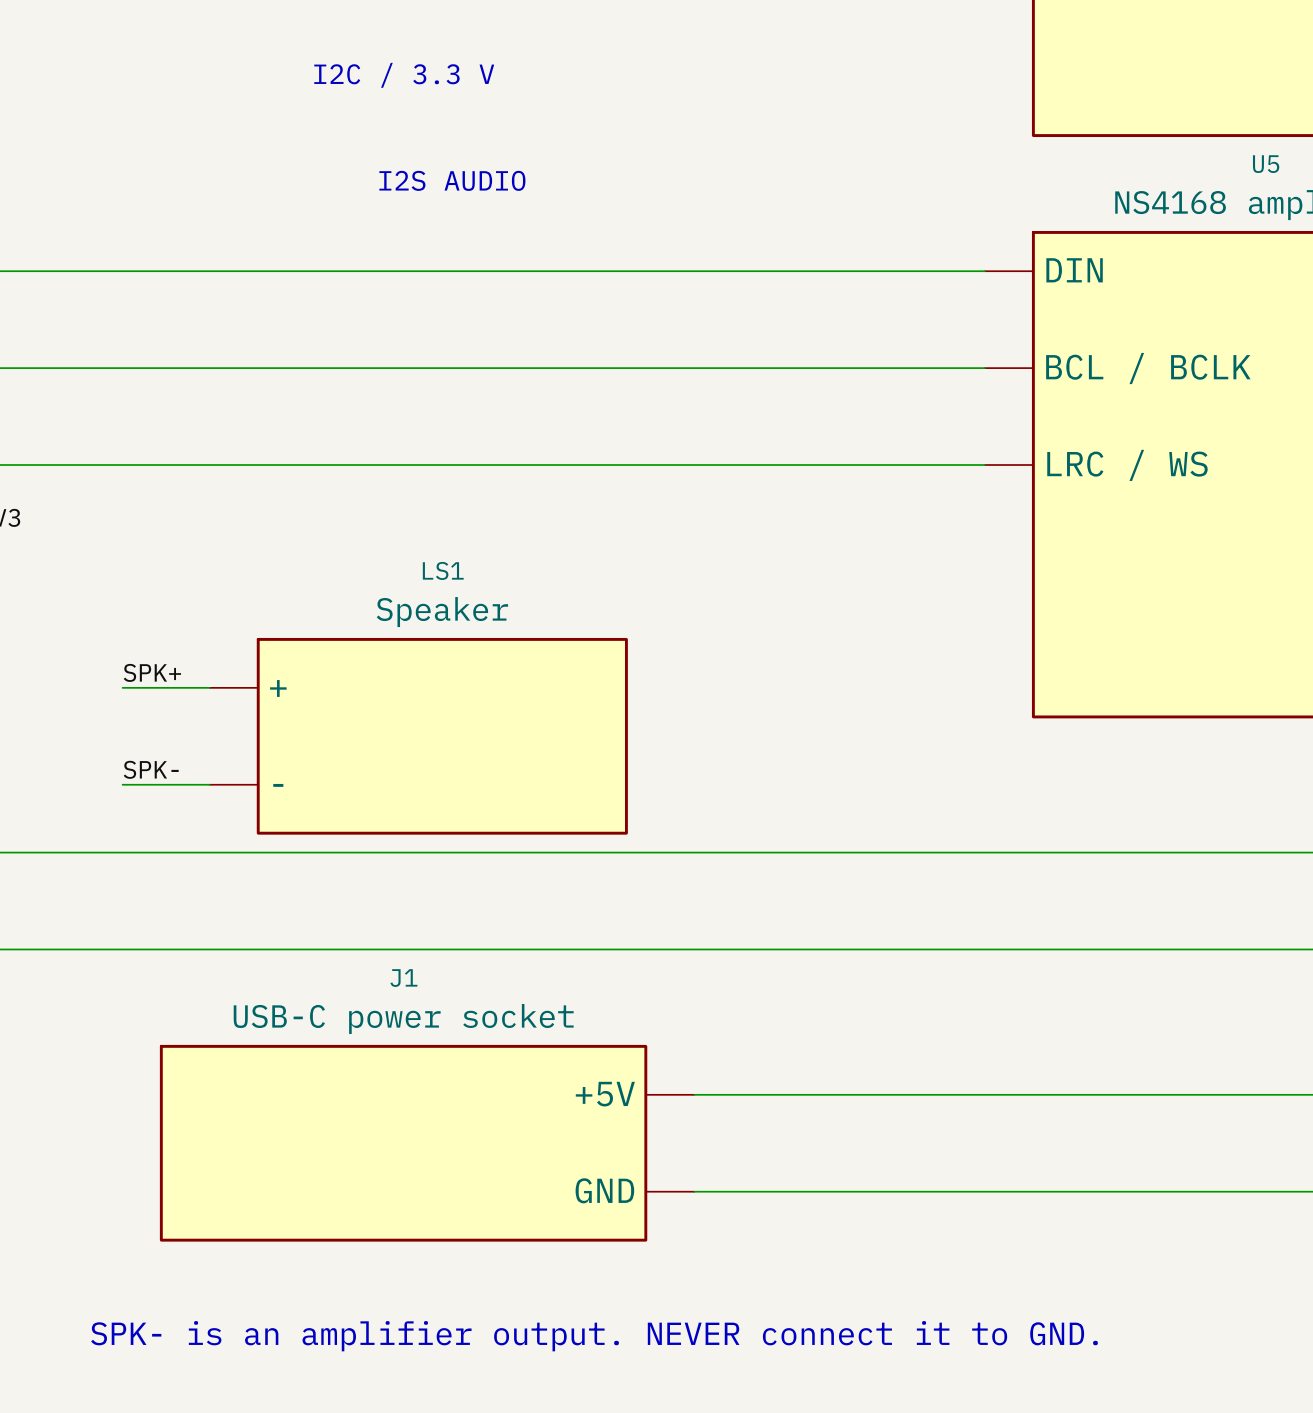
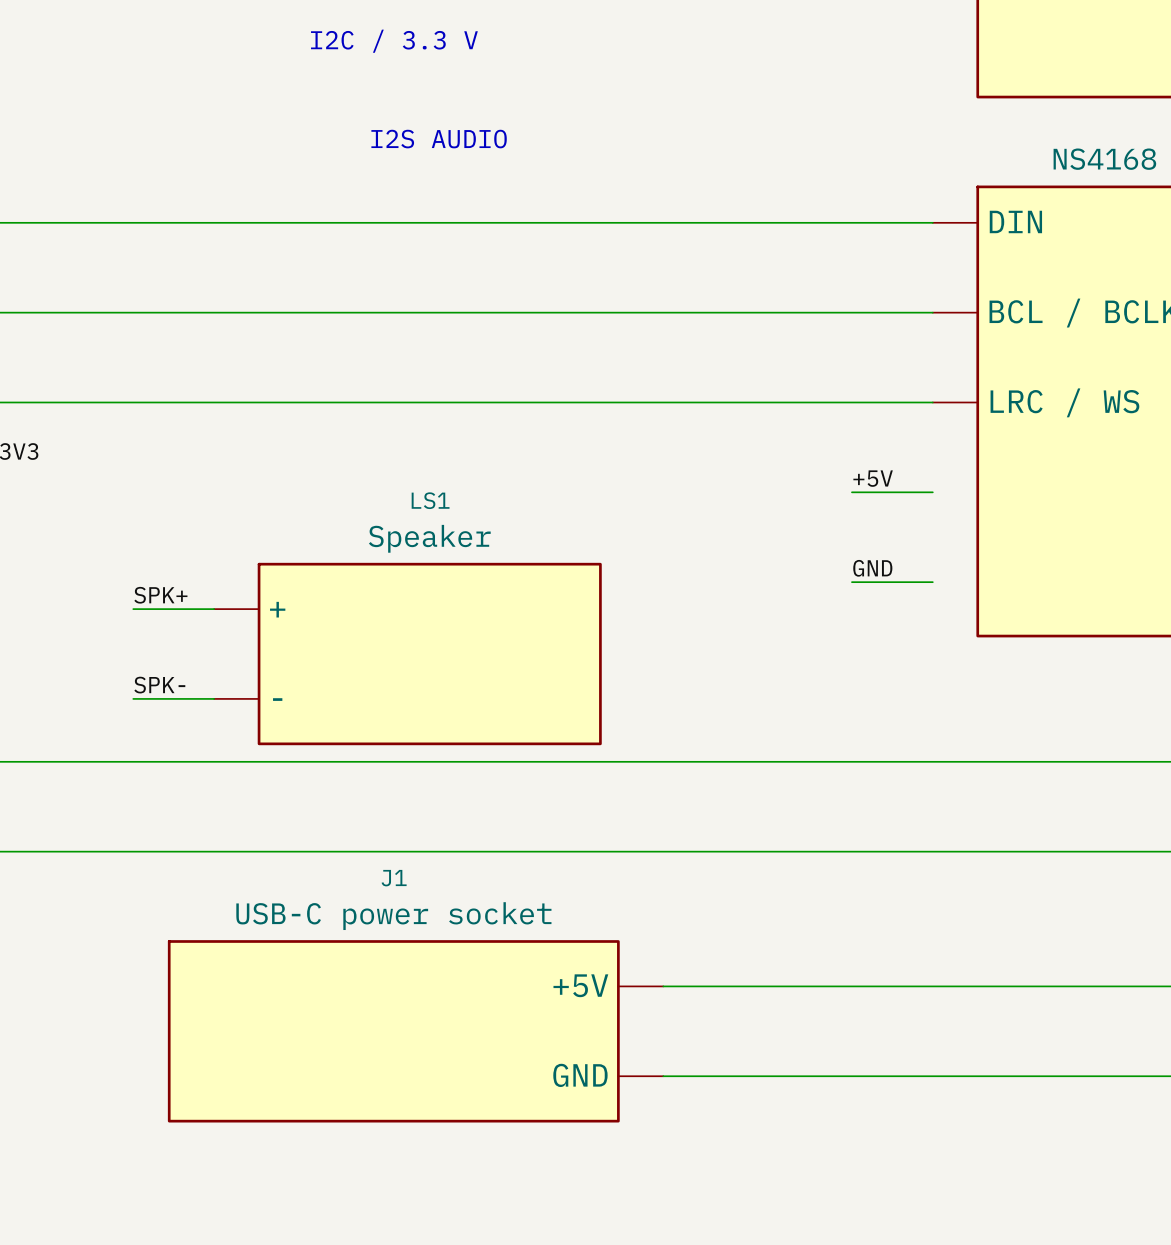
label: none -> +5V (873, 478)
wire: none -> (851, 492) (932, 492)
label: none -> GND (872, 568)
wire: none -> (851, 582) (932, 582)
text: SPK- is an amplifier output. NEVER connect it to GND. (594, 1336) -> none

